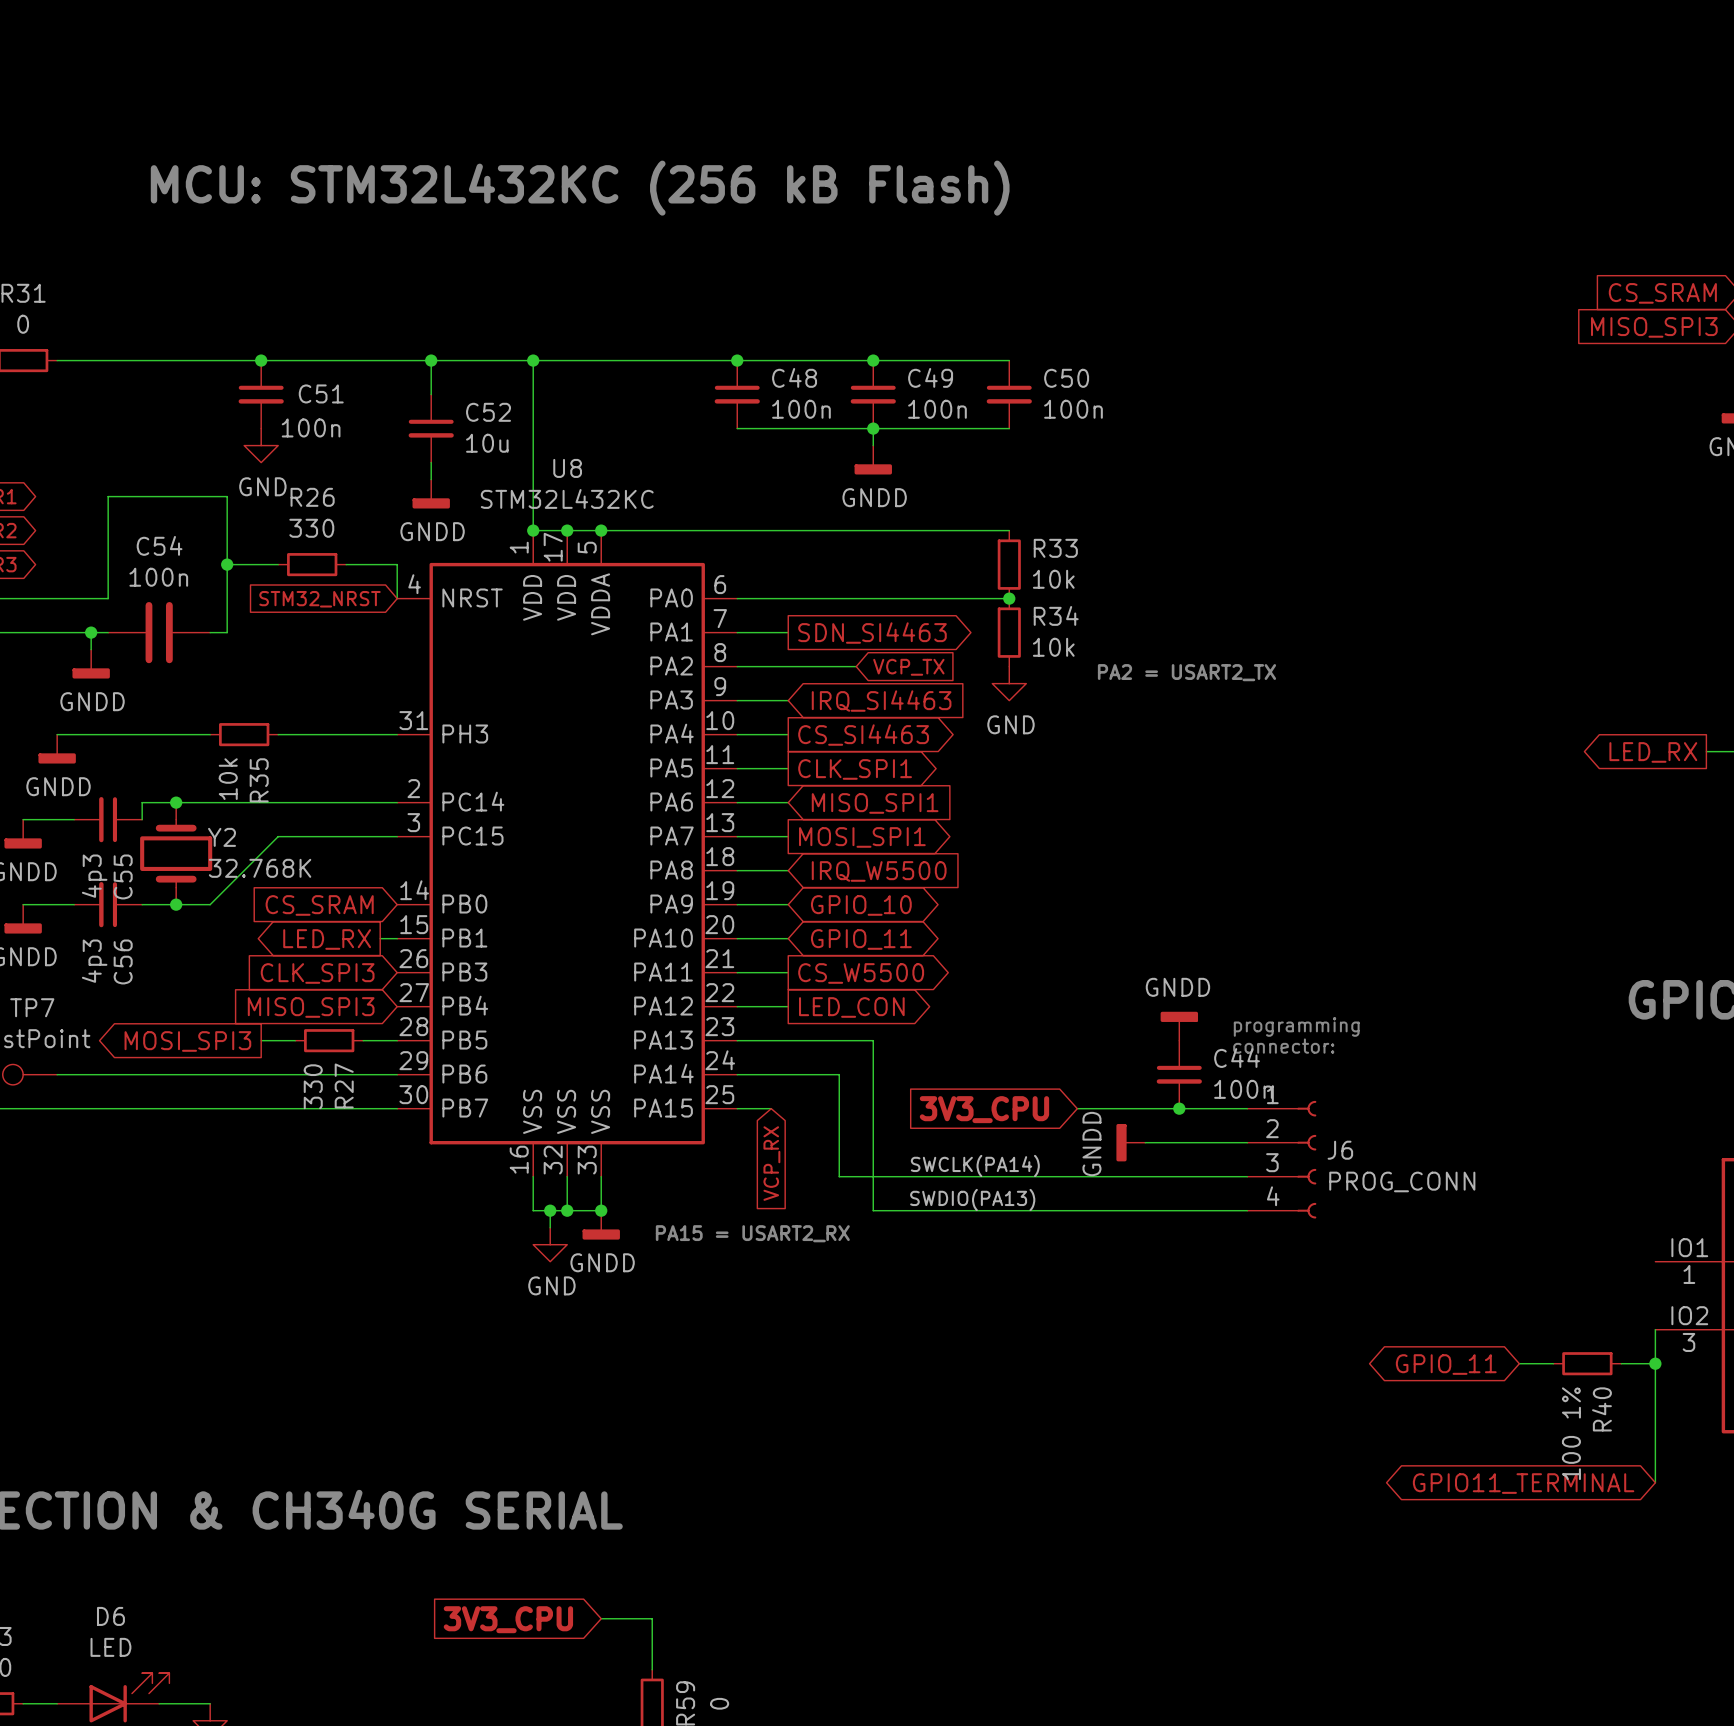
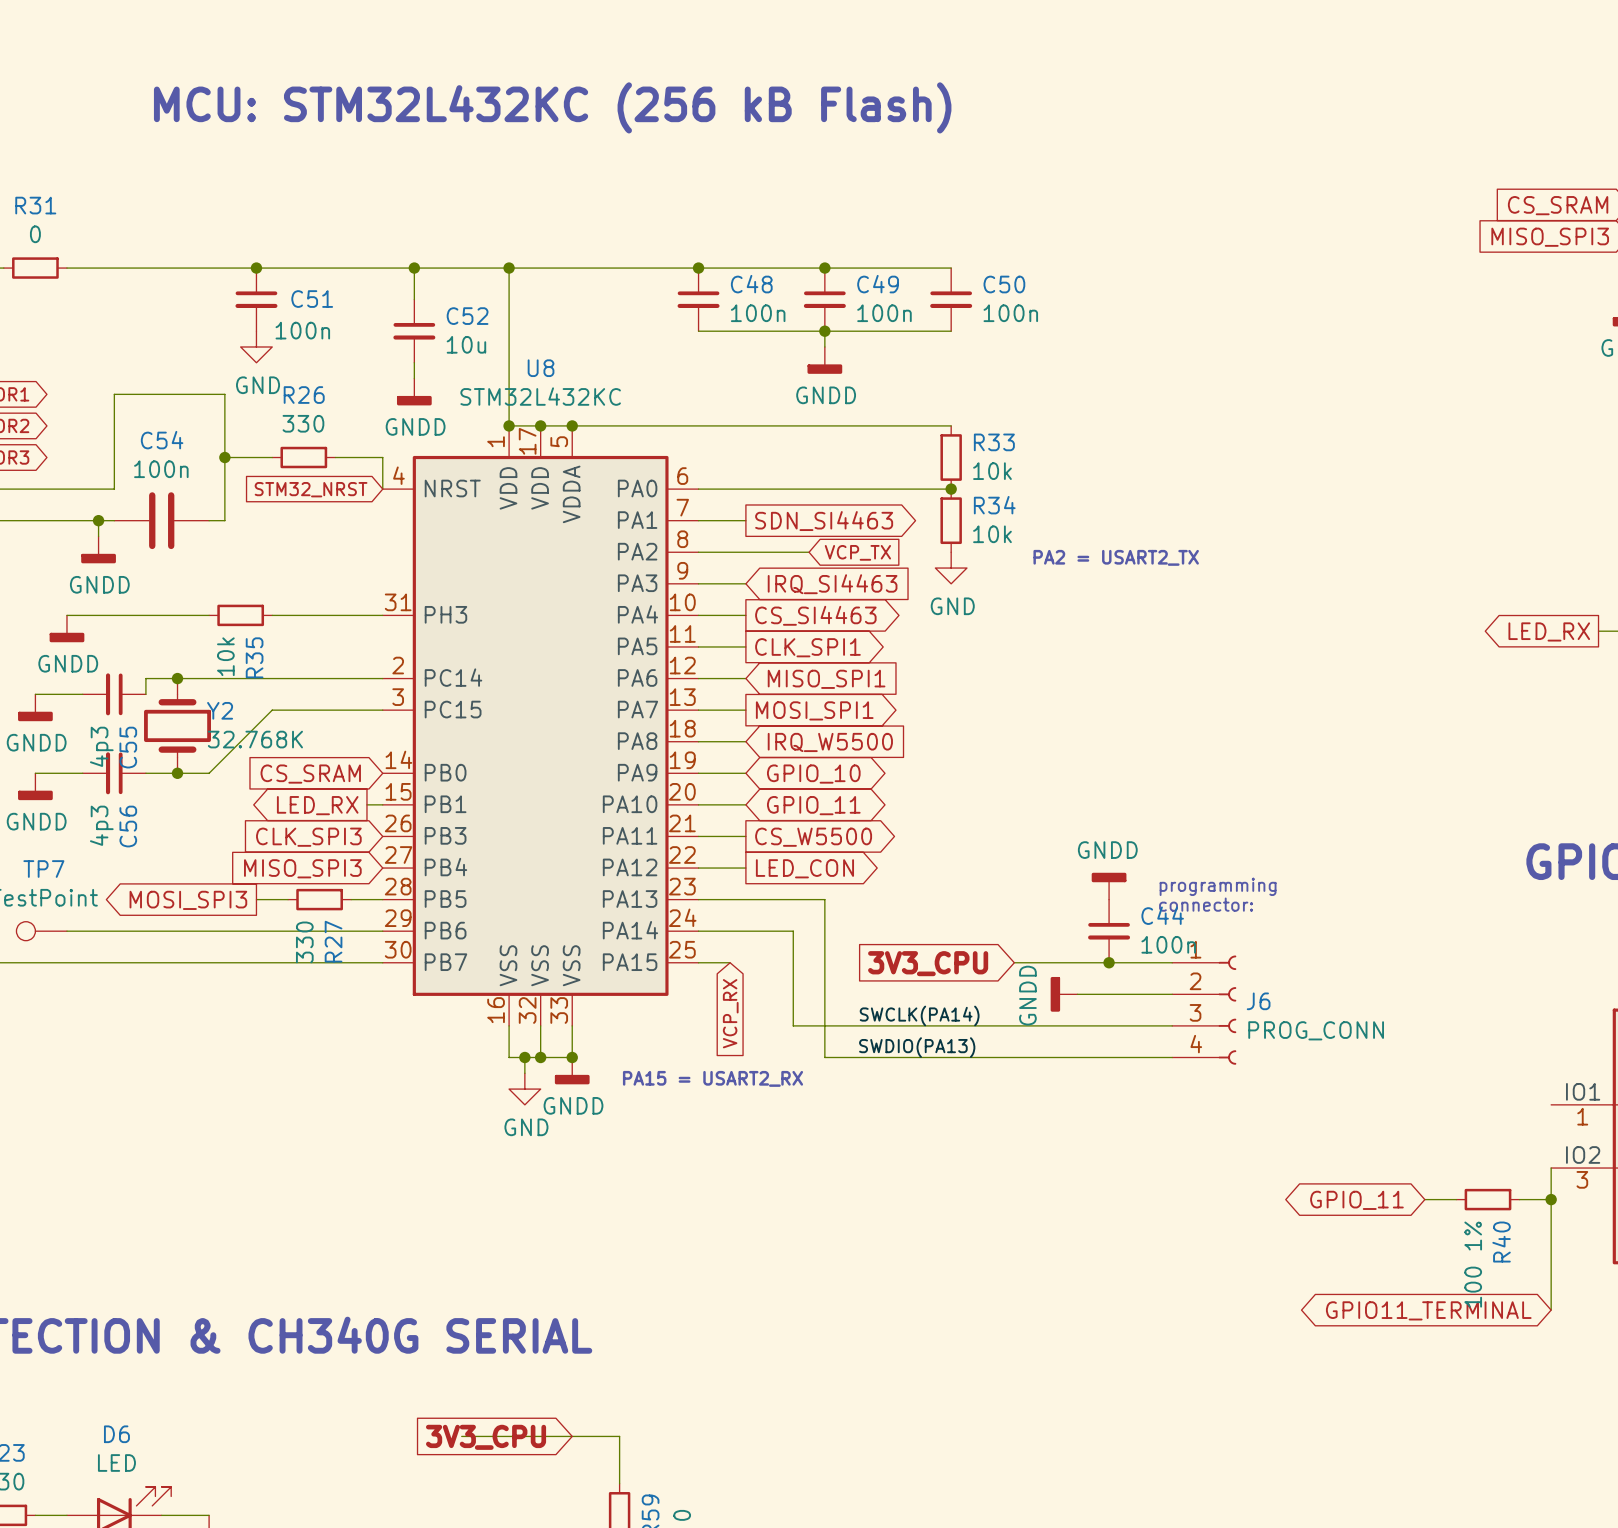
wire: none -> (461, 1436) (572, 1436)

